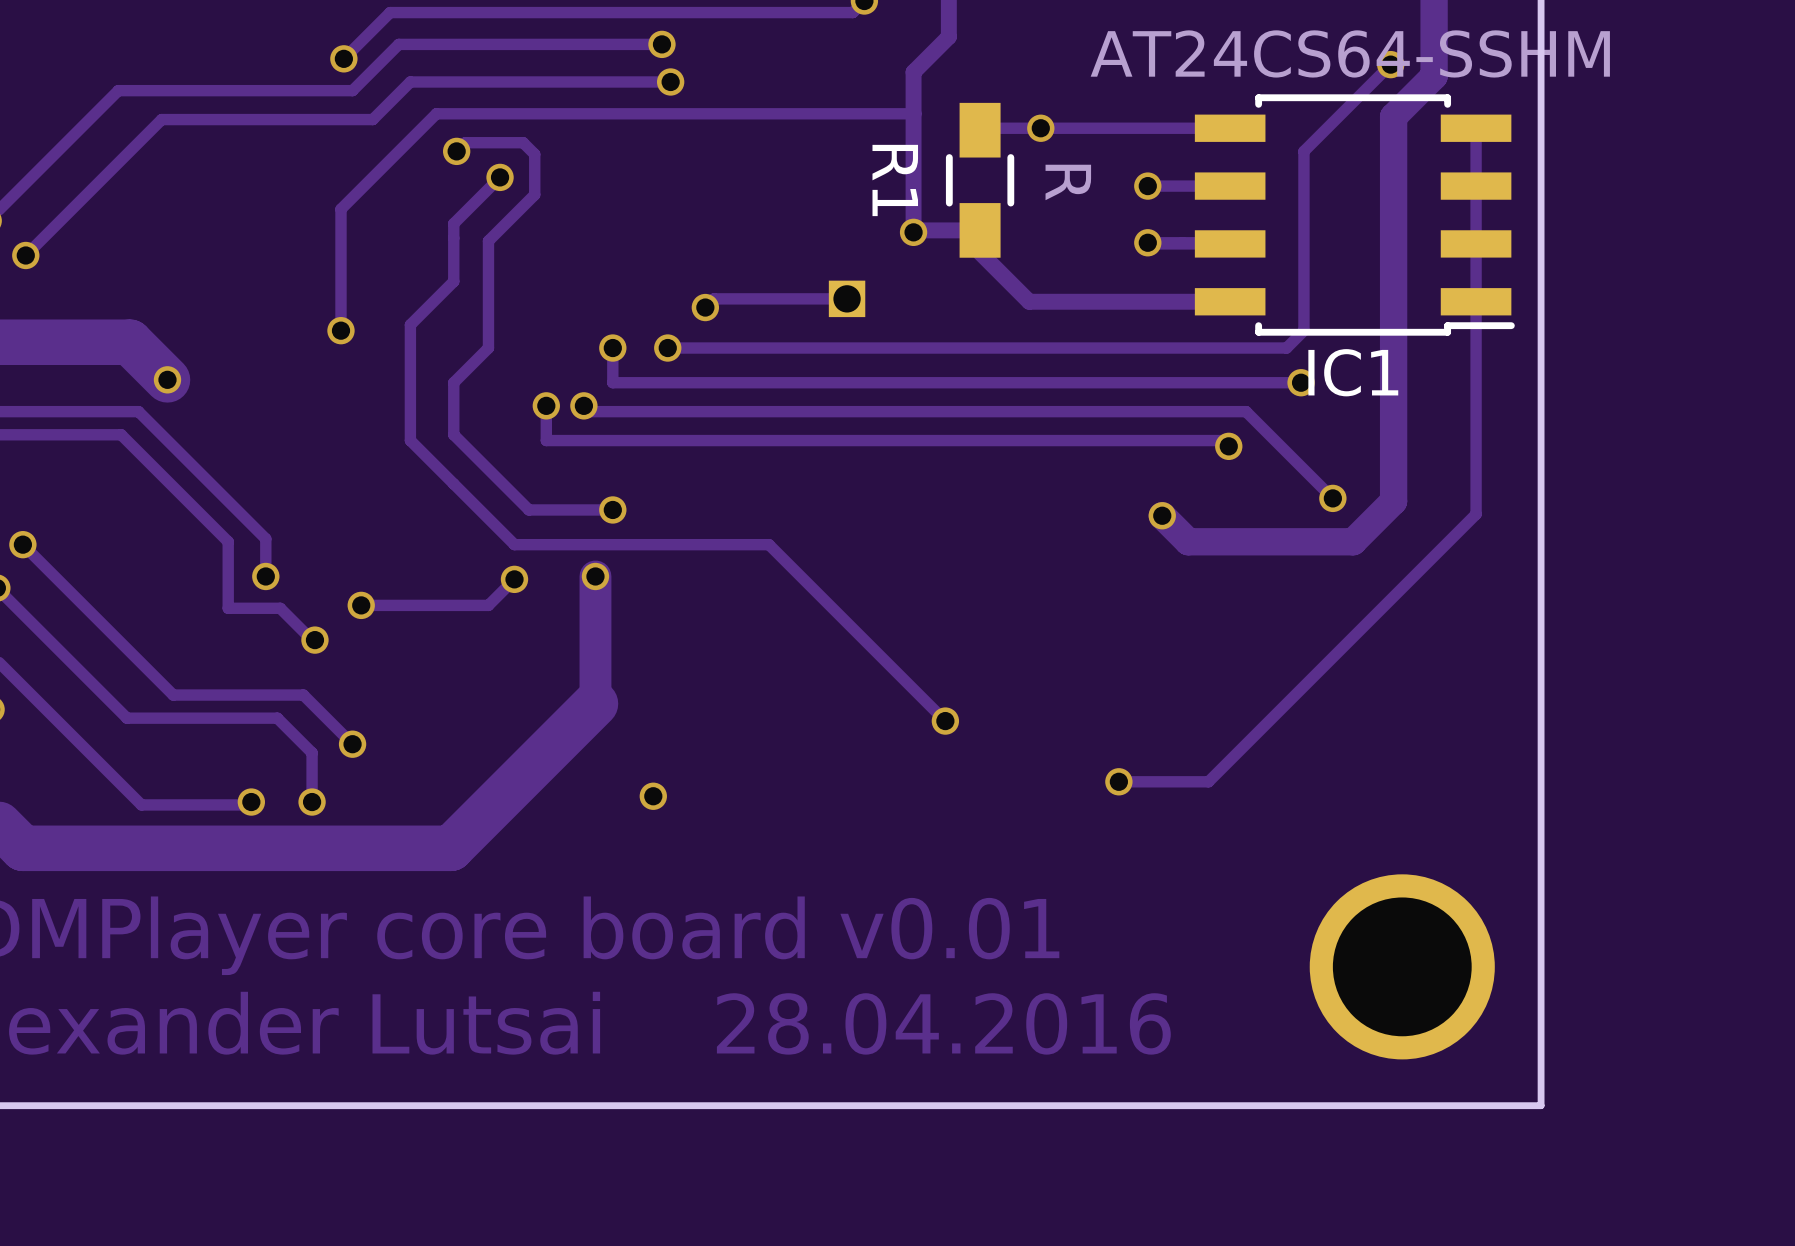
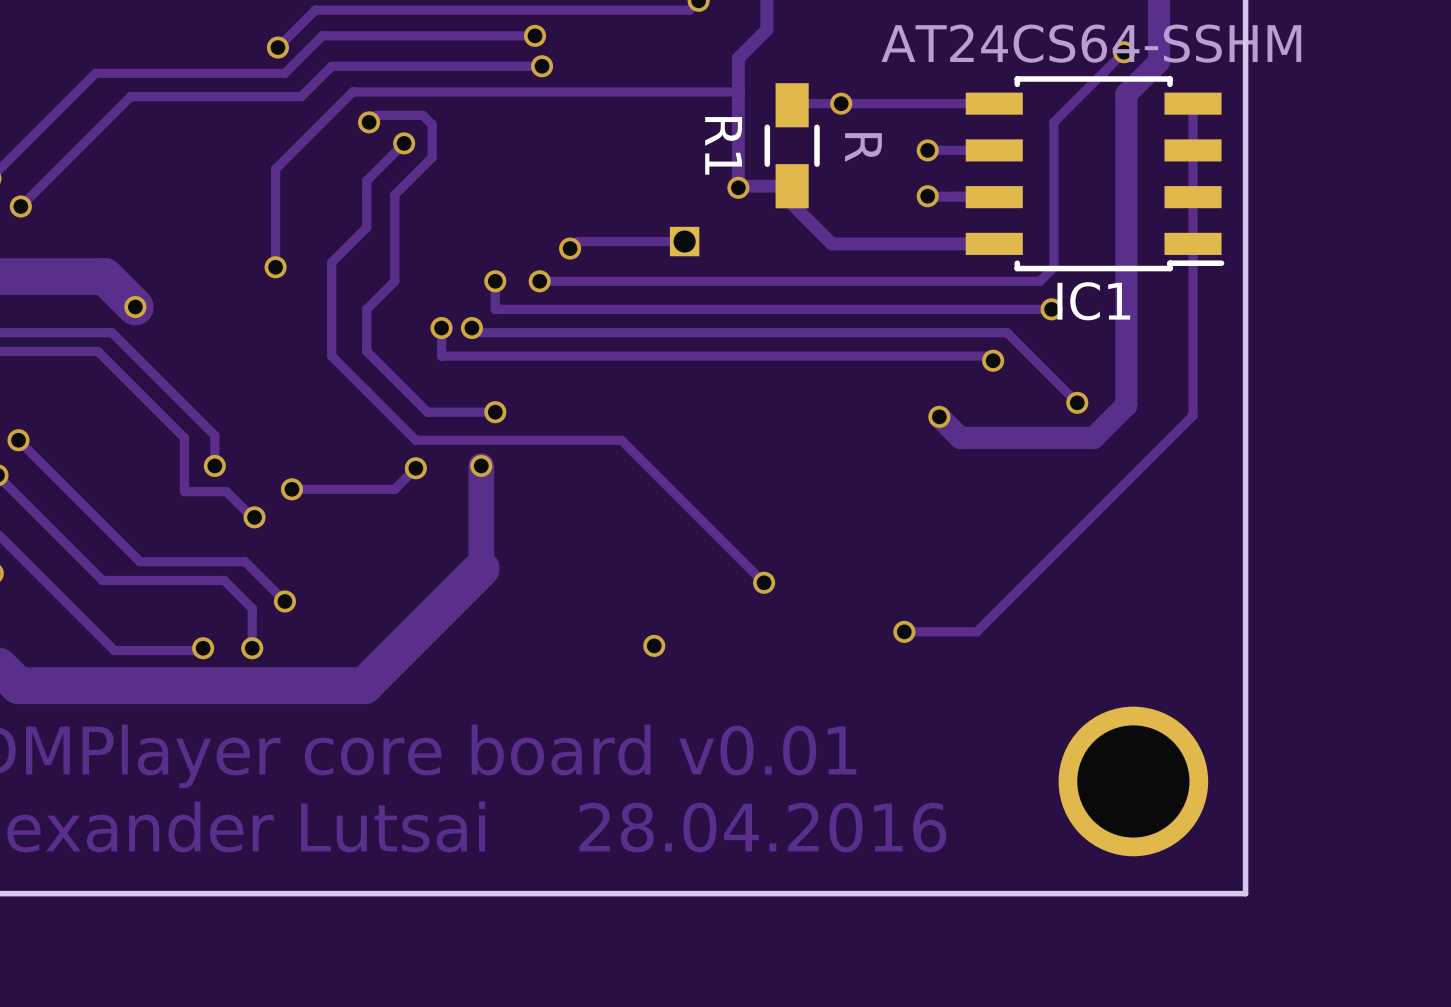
via position: (653, 796) -> (654, 645)

